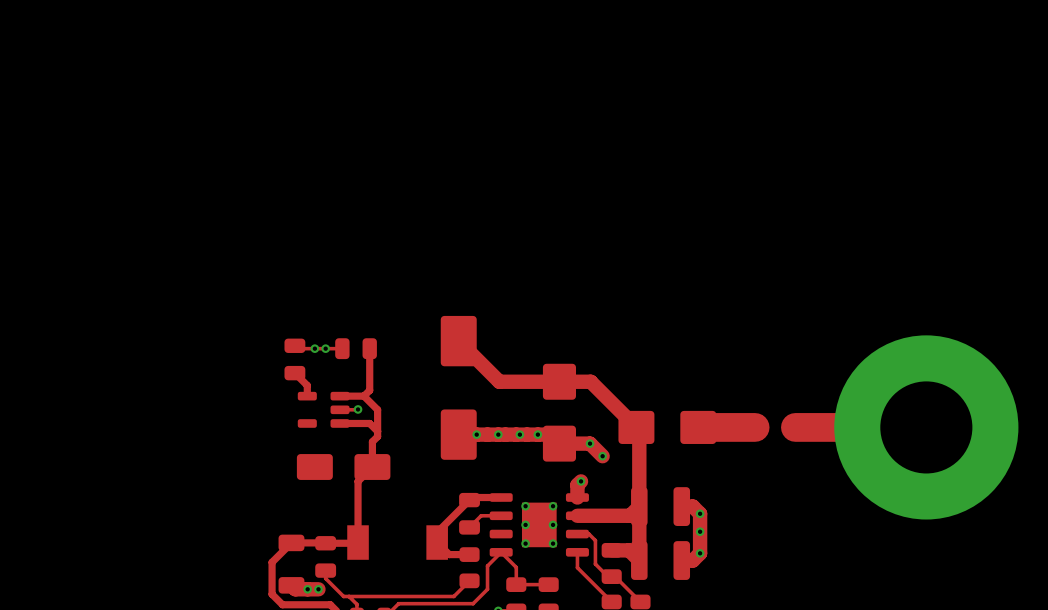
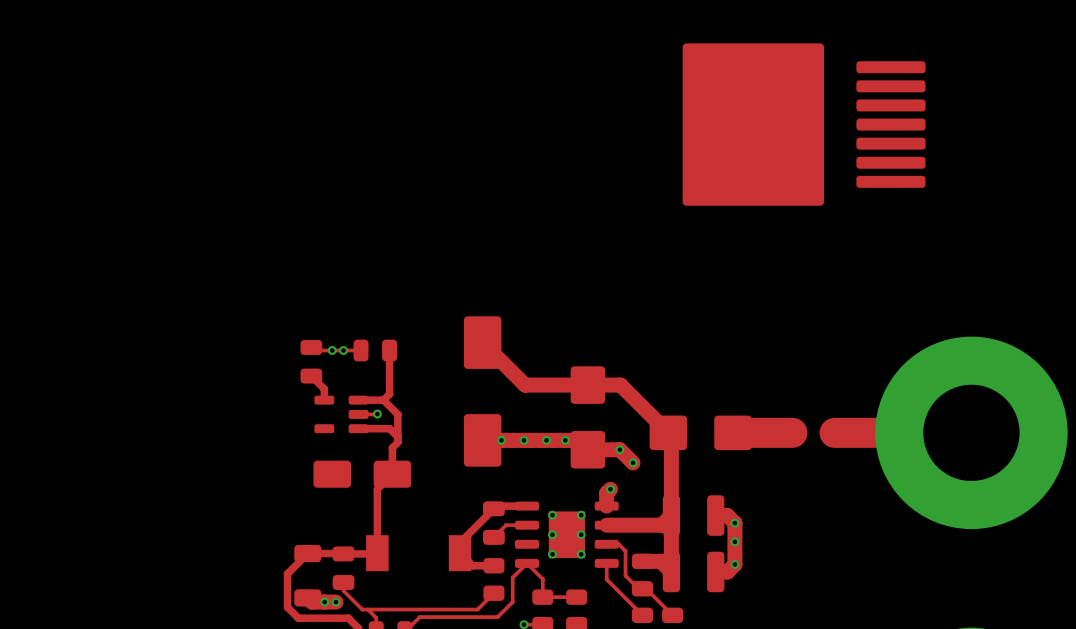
part: none -> (804, 124)

